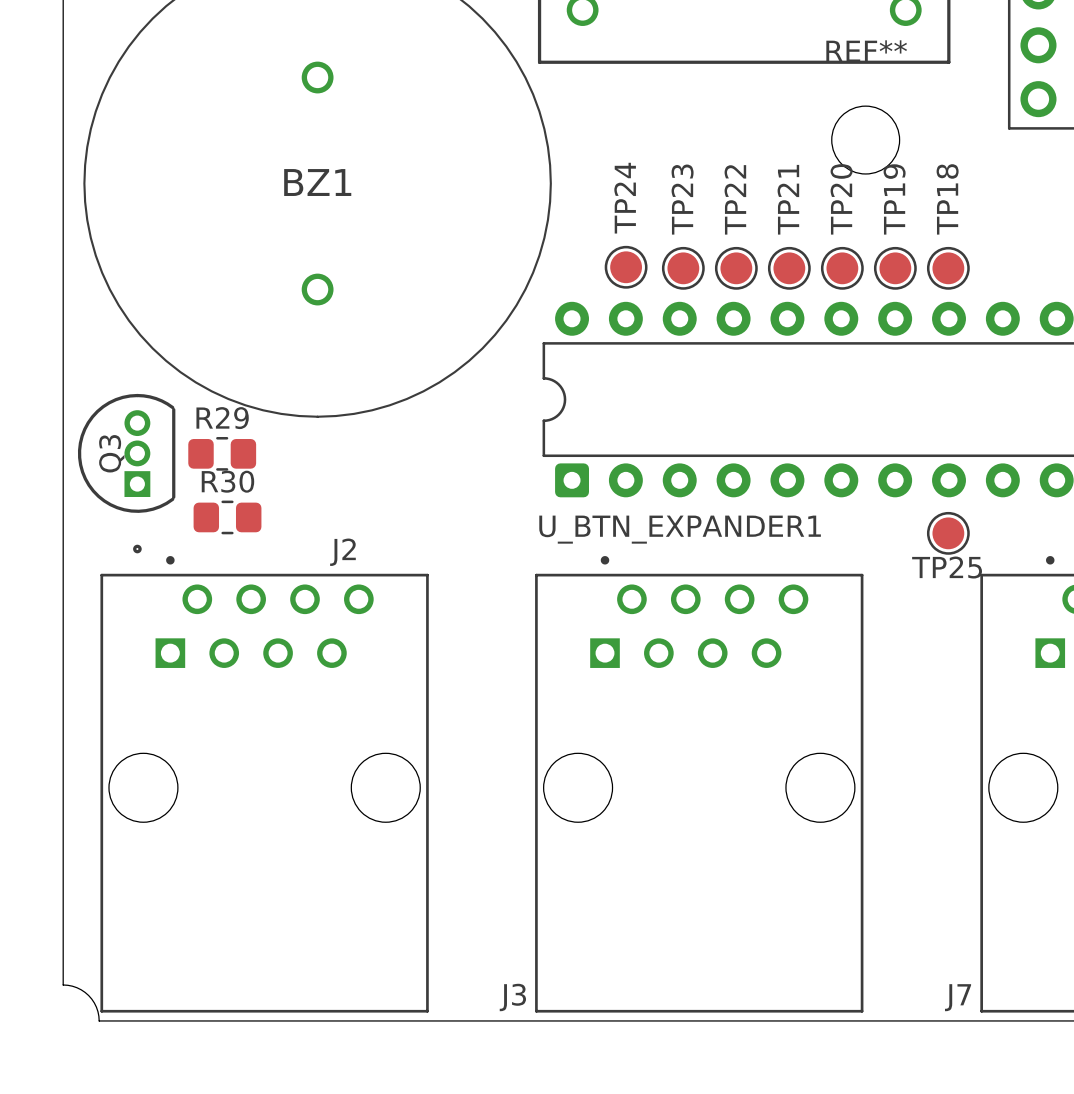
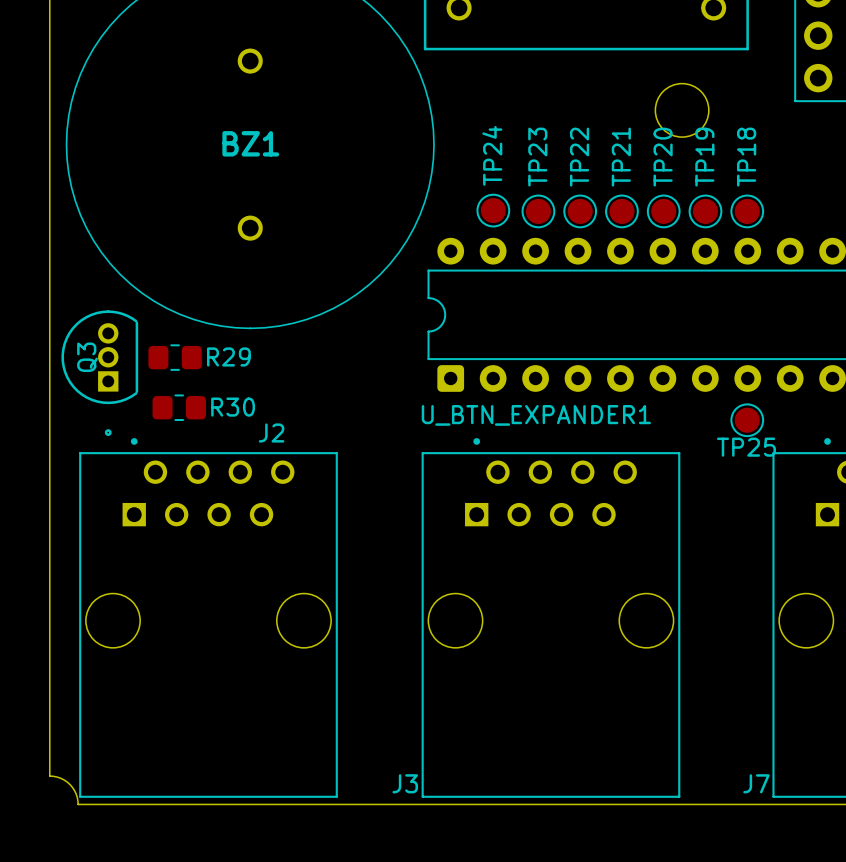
REF** name: REF** (866, 51) -> none
R29 name position: R29 (222, 418) -> R29 (228, 356)
R30 name position: R30 (227, 481) -> R30 (233, 407)

